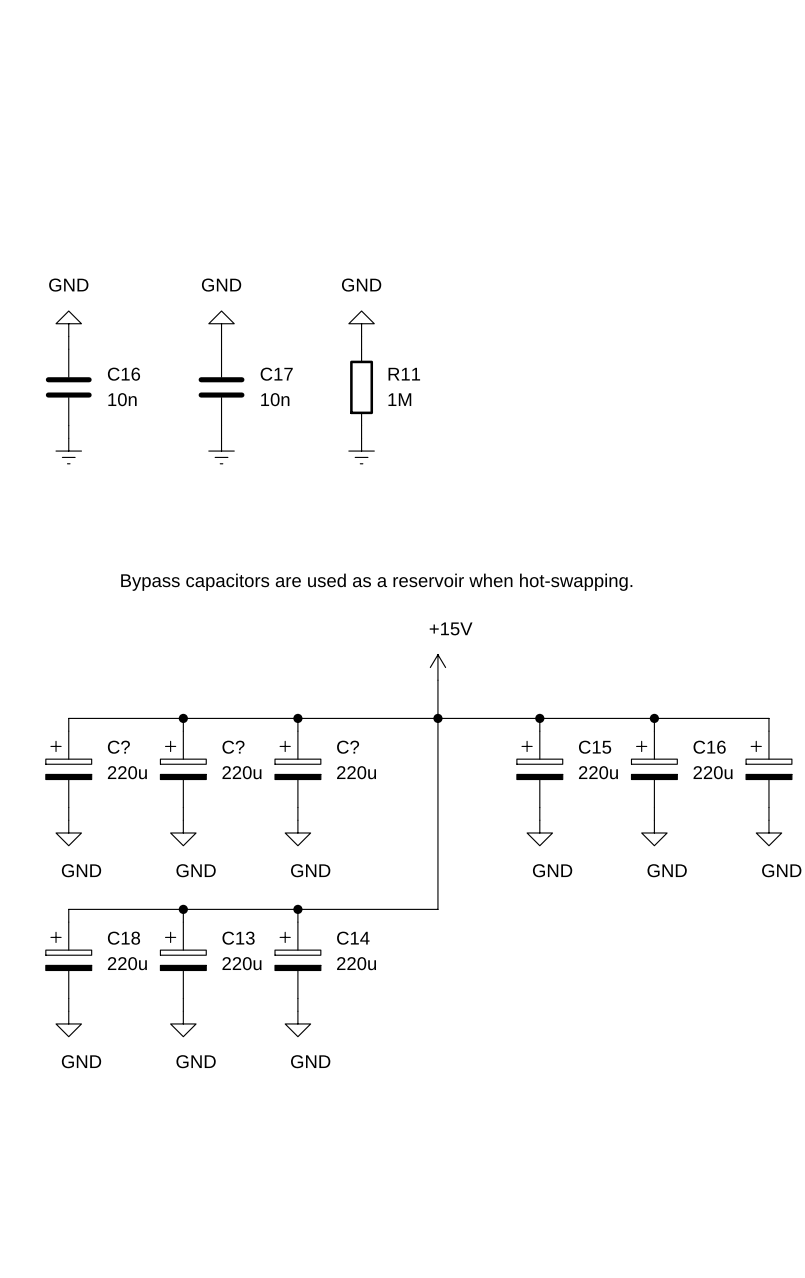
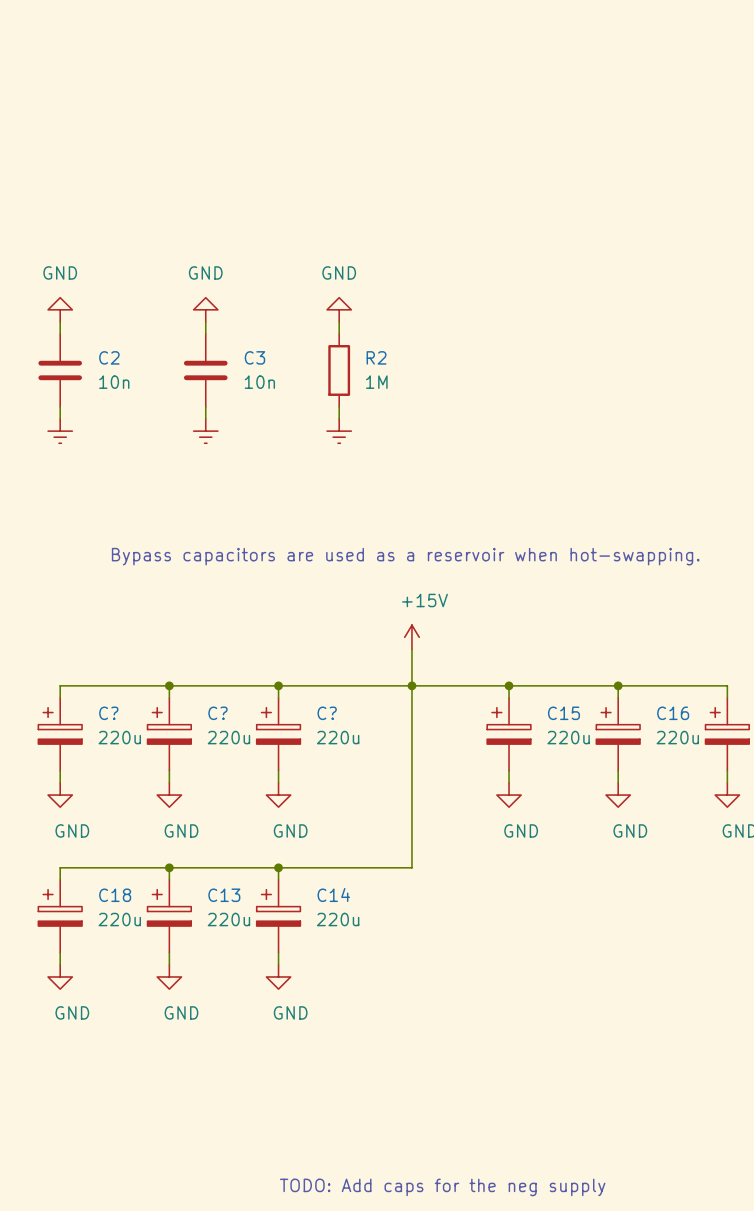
C16 name: C16 (123, 374) -> C2 (109, 357)
C17 name: C17 (276, 374) -> C3 (254, 357)
R11 name: R11 (404, 374) -> R2 (376, 357)
text: none -> TODO: Add caps for the neg supply (442, 1187)

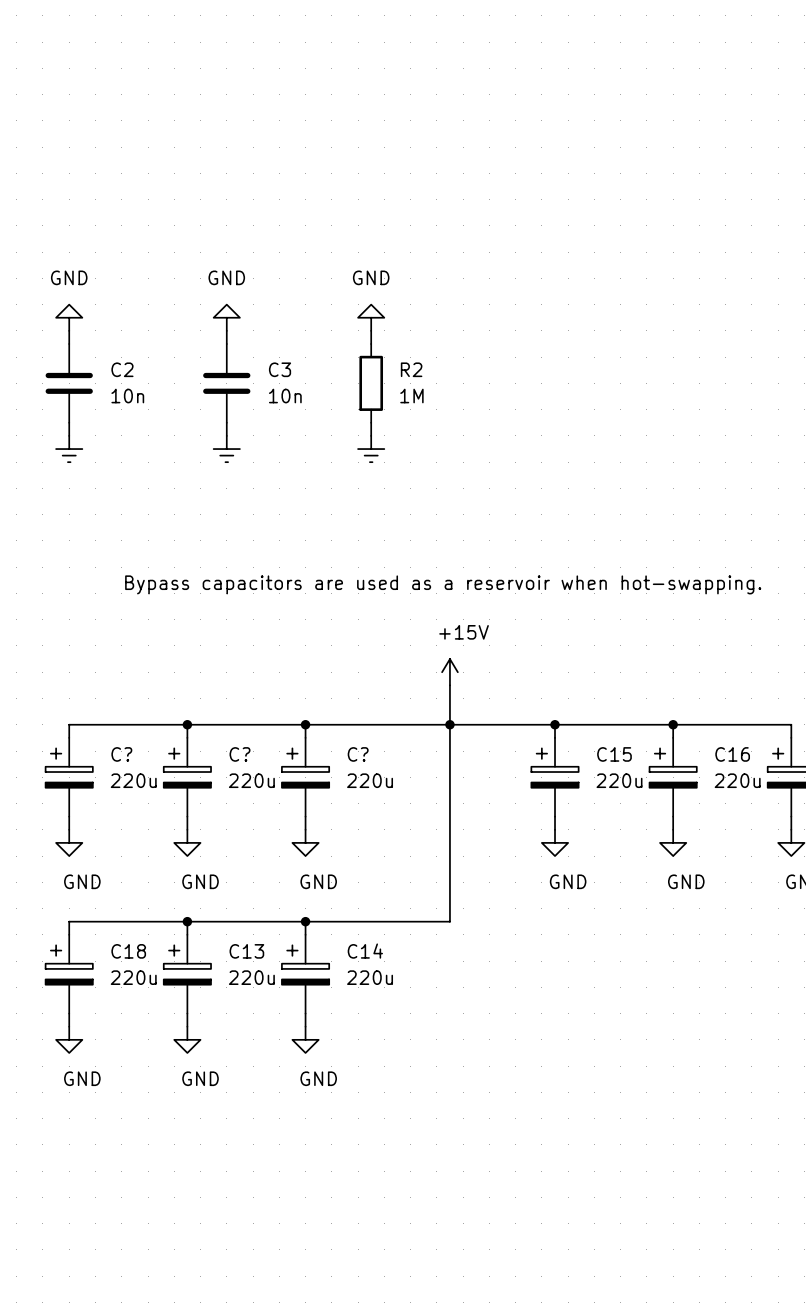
text: TODO: Add caps for the neg supply (442, 1187) -> none

